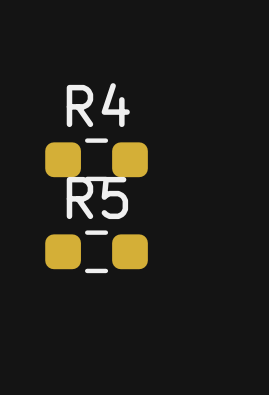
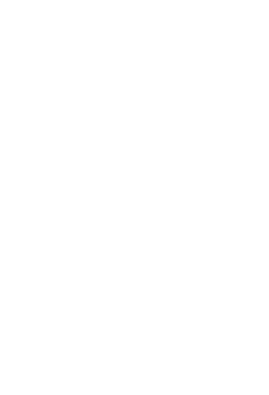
R4: (96, 159) -> none
R5: (96, 251) -> none

